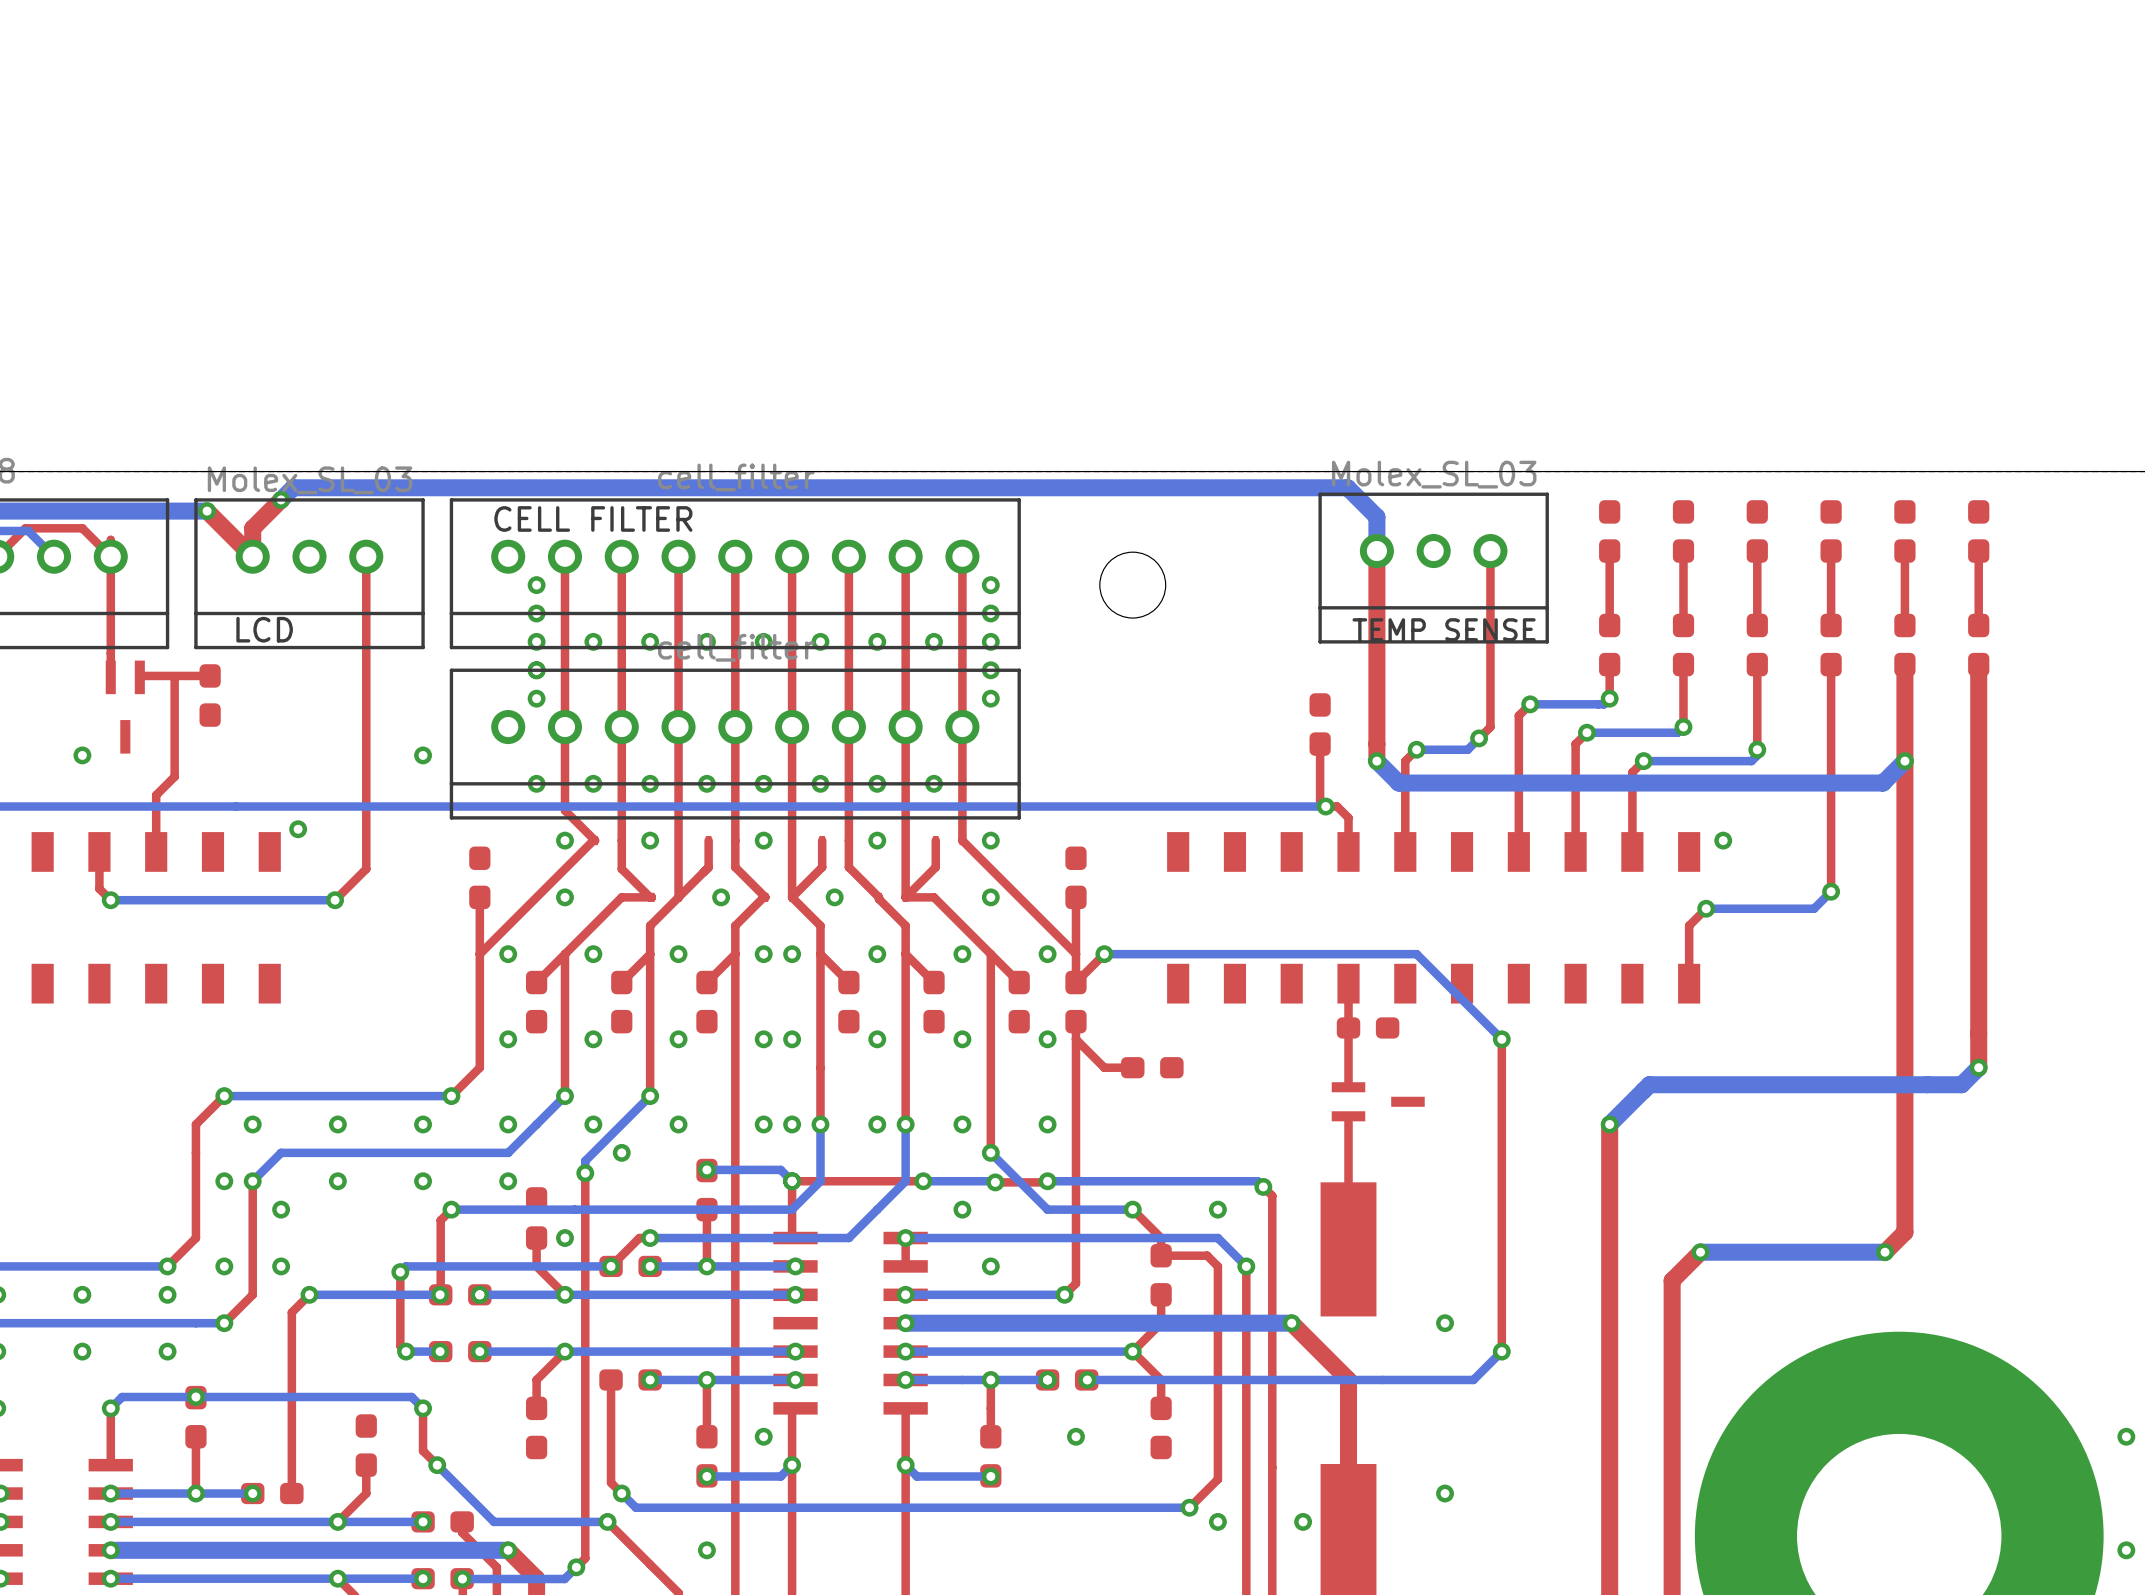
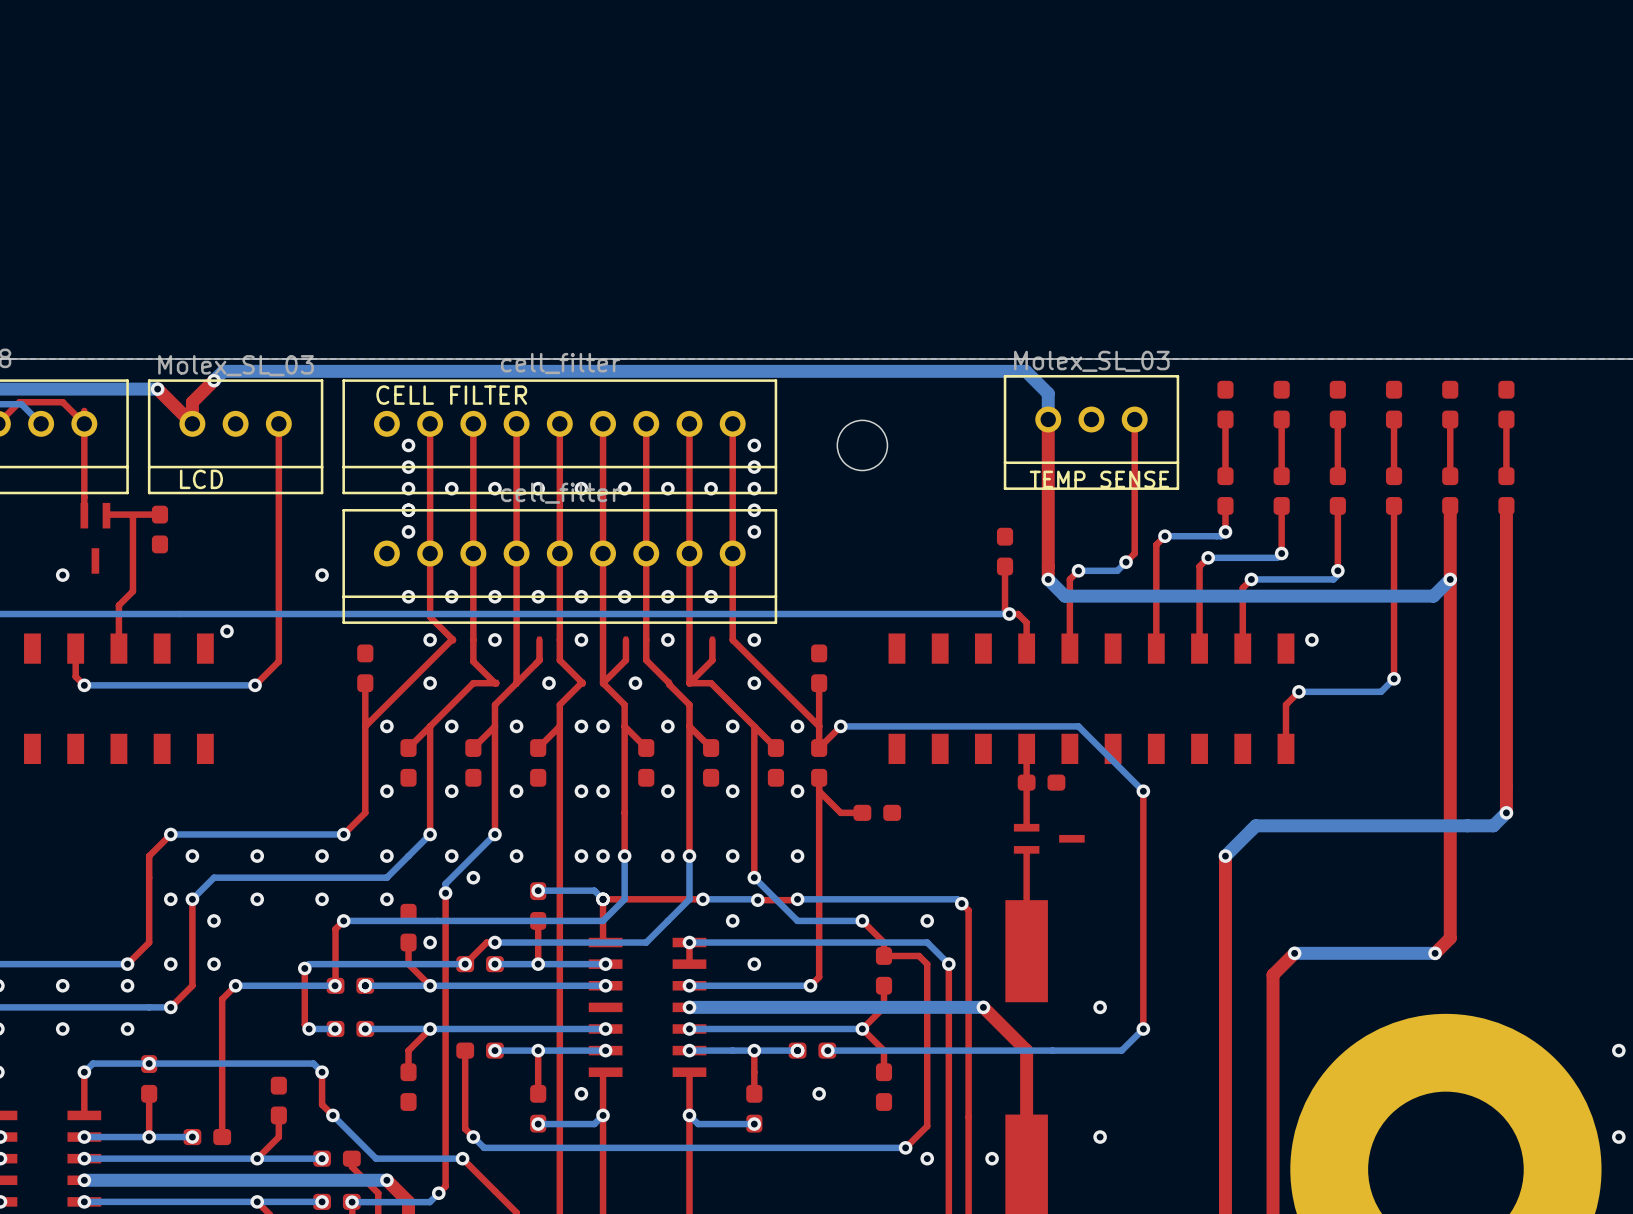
via: none -> (1618, 1050)
via: (2126, 1436) -> none
via: none -> (1618, 1137)
via: (706, 1550) -> none
via: (2126, 1550) -> none

